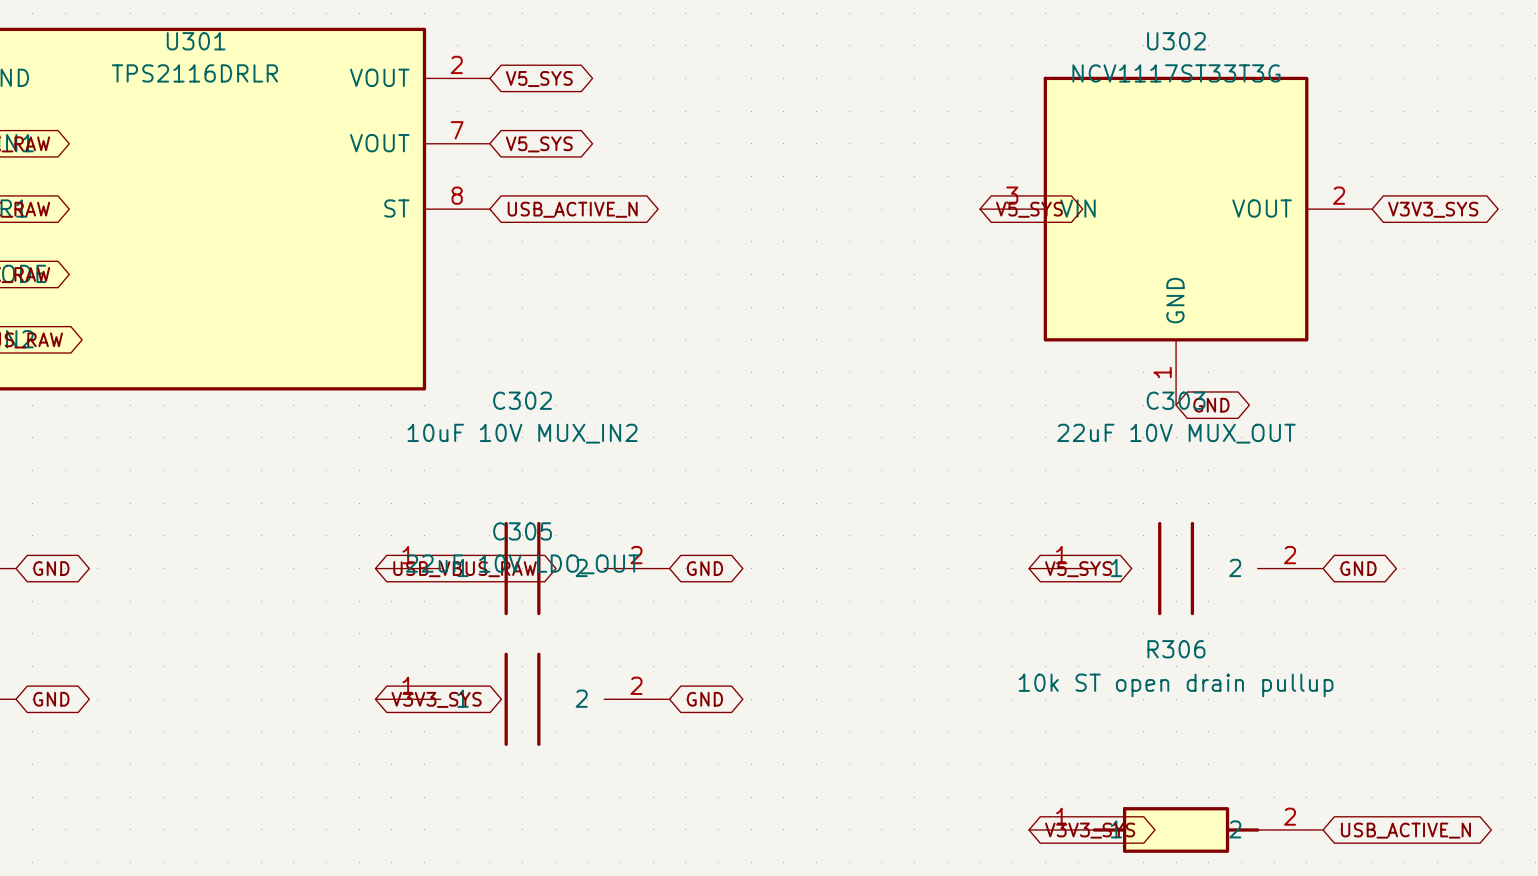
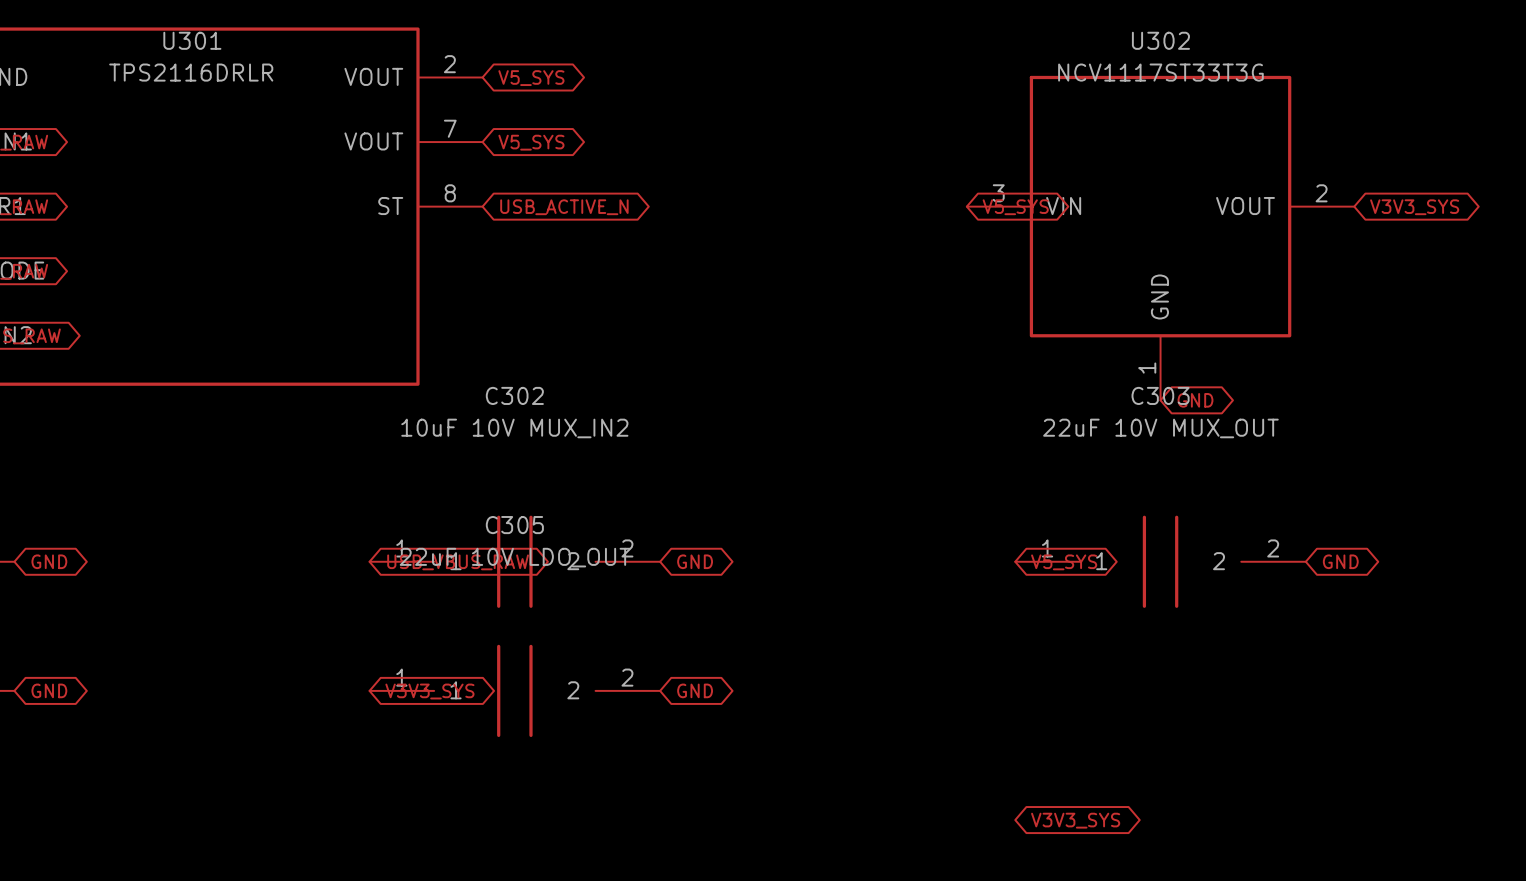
R306: 10k ST open drain pullup (1176, 829) -> none
global label: USB_ACTIVE_N (1405, 830) -> none

